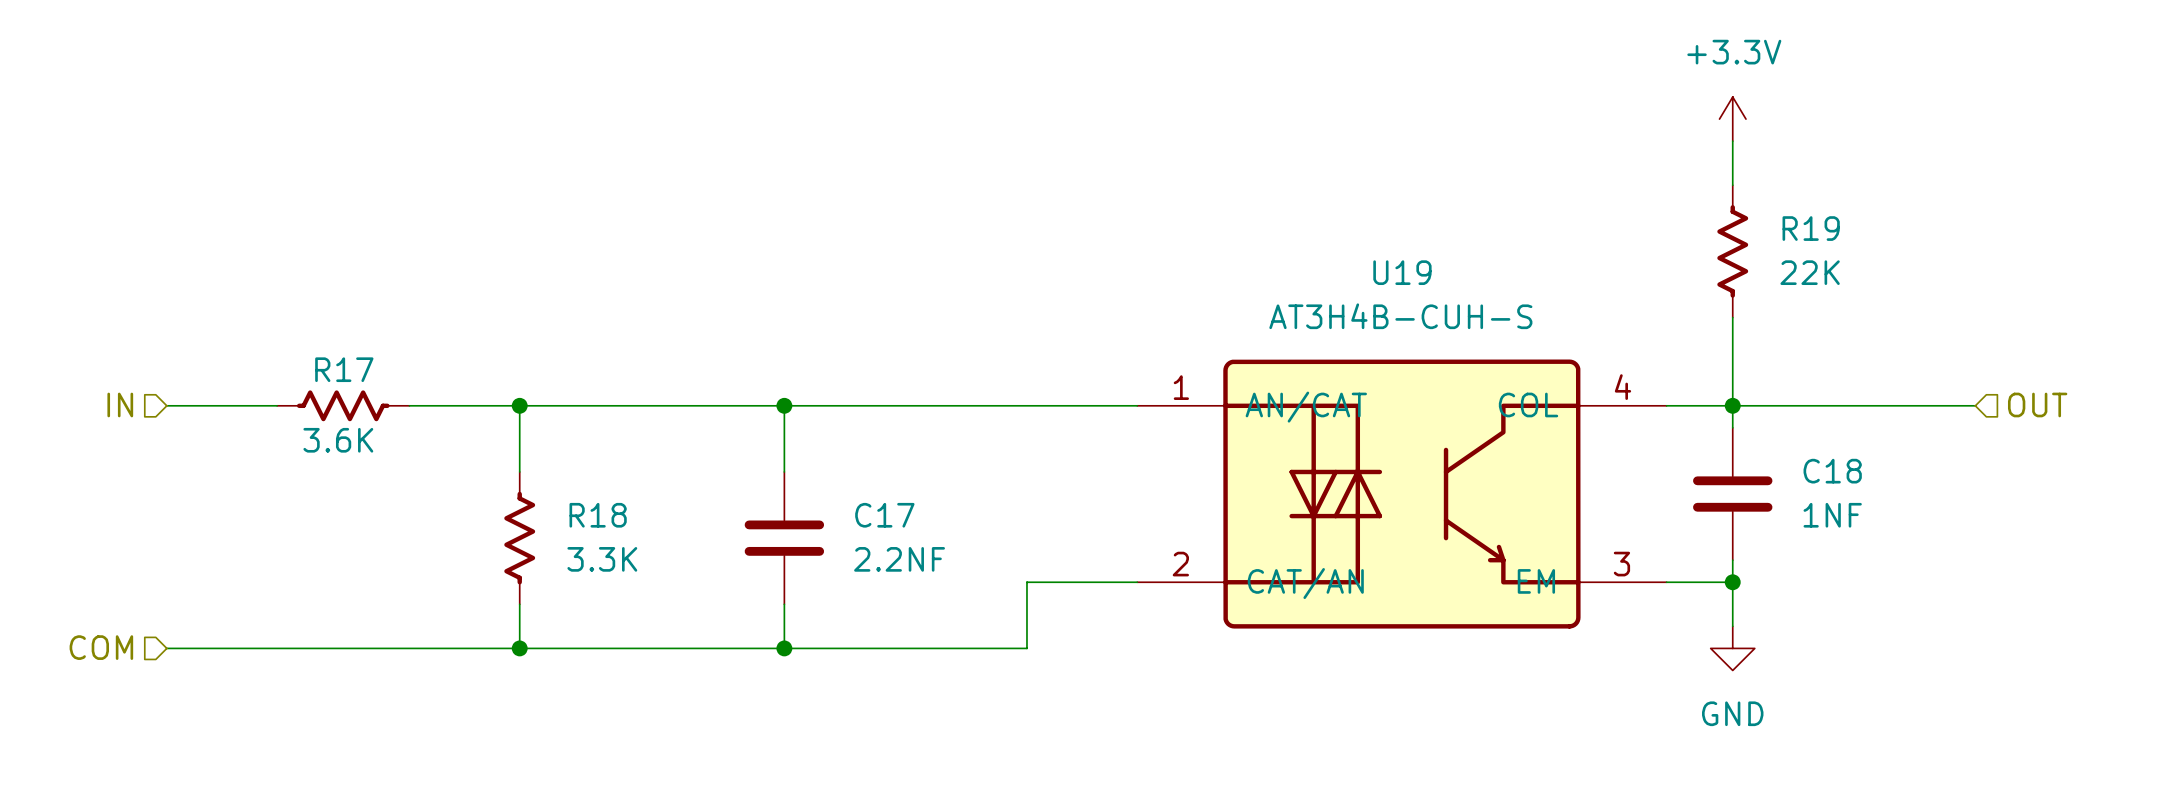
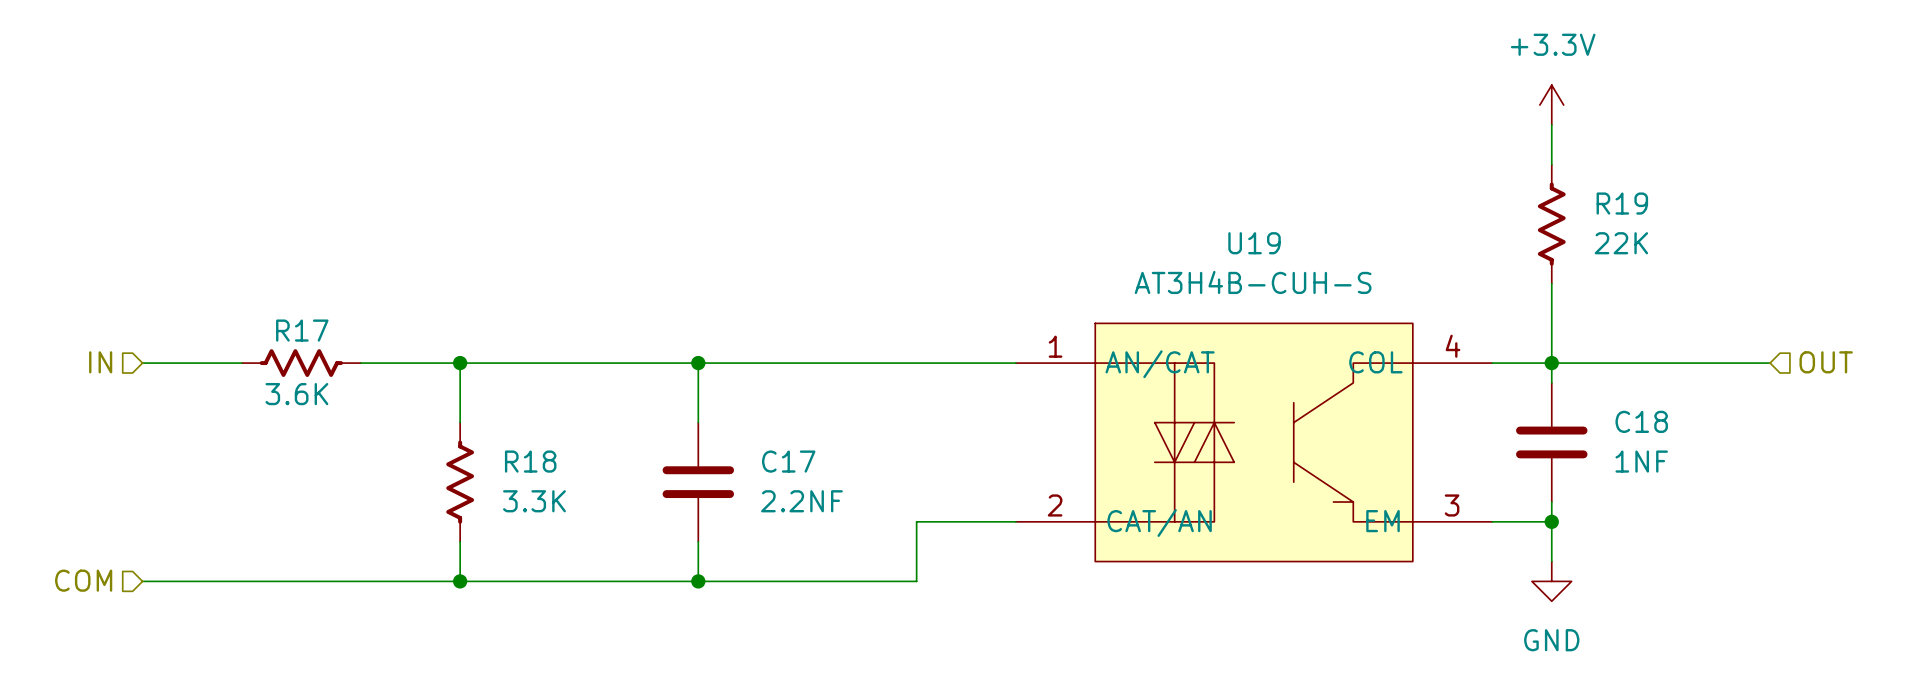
U19 symbol: [1137, 359, 1667, 629] -> [1015, 323, 1493, 562]

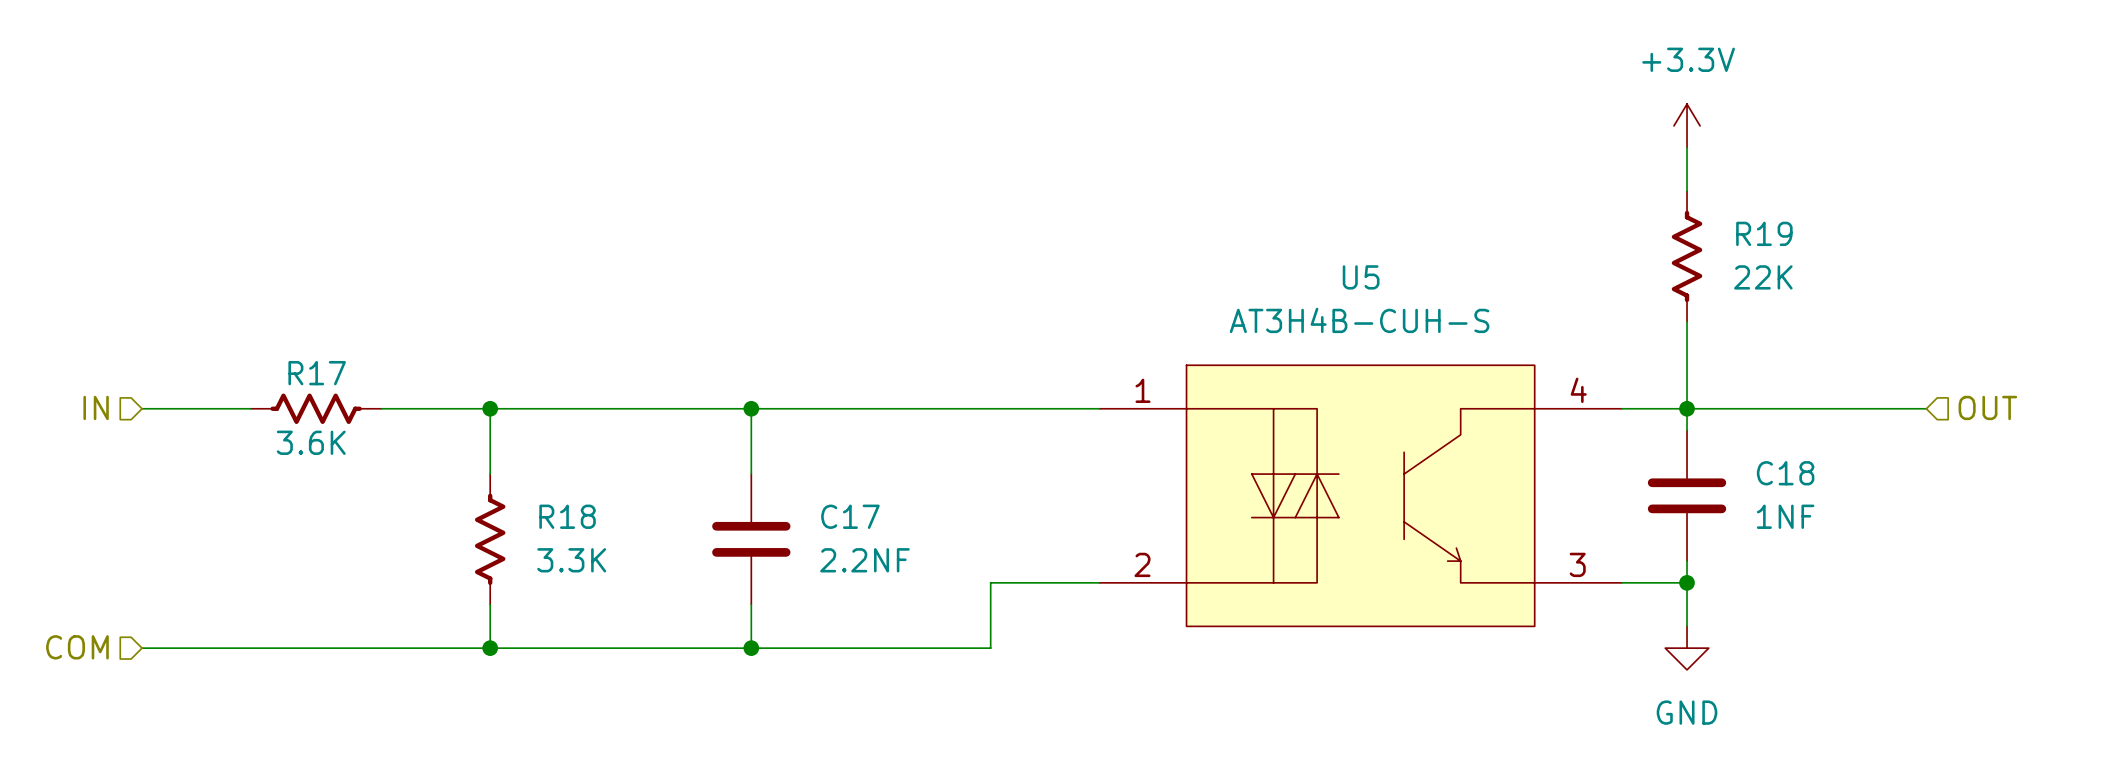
U19: AT3H4B-CUH-S (1254, 442) -> none
U5: none -> AT3H4B-CUH-S (1360, 495)

